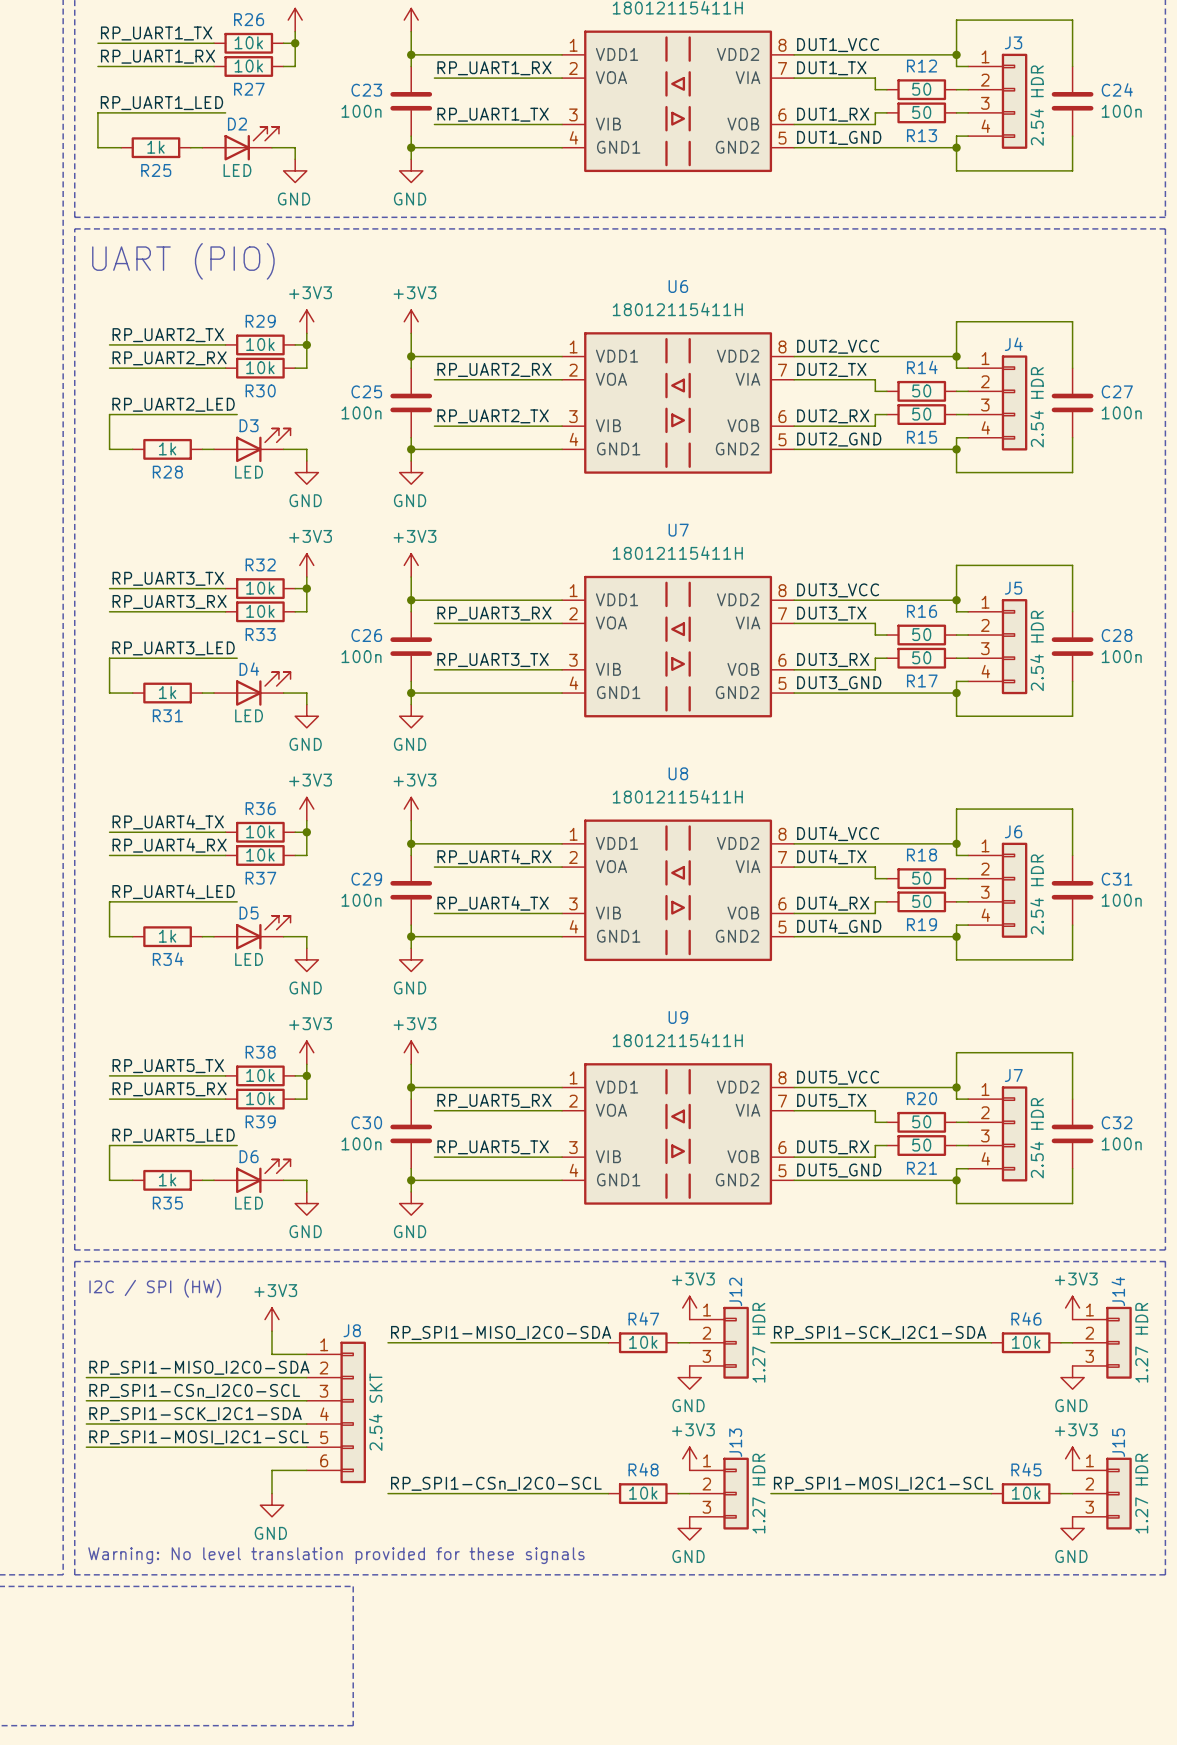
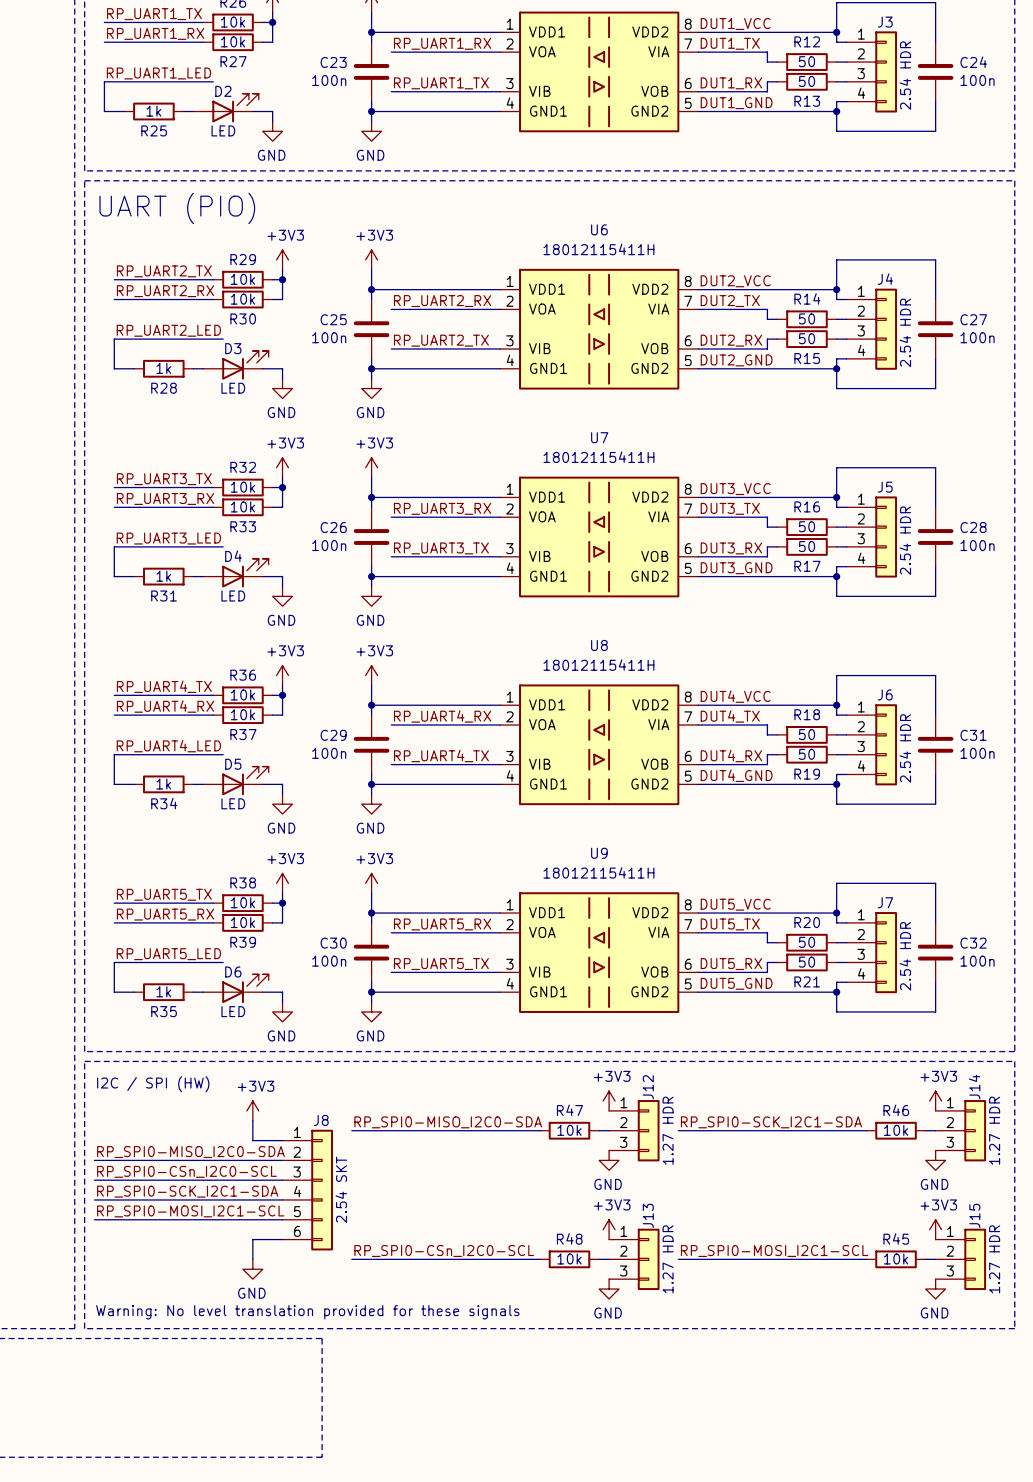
label: RP_SPI1-MISO_I2C0-SDA (501, 1332) -> RP_SPI0-MISO_I2C0-SDA (448, 1122)
label: RP_SPI1-SCK_I2C1-SDA (880, 1332) -> RP_SPI0-SCK_I2C1-SDA (771, 1122)
label: RP_SPI1-MISO_I2C0-SDA (199, 1367) -> RP_SPI0-MISO_I2C0-SDA (190, 1152)
label: RP_SPI1-CSn_I2C0-SCL (194, 1390) -> RP_SPI0-CSn_I2C0-SCL (186, 1171)
label: RP_SPI1-SCK_I2C1-SDA (195, 1414) -> RP_SPI0-SCK_I2C1-SDA (187, 1191)
label: RP_SPI1-MOSI_I2C1-SCL (199, 1437) -> RP_SPI0-MOSI_I2C1-SCL (190, 1211)
label: RP_SPI1-CSn_I2C0-SCL (496, 1483) -> RP_SPI0-CSn_I2C0-SCL (444, 1250)
label: RP_SPI1-MOSI_I2C1-SCL (883, 1483) -> RP_SPI0-MOSI_I2C1-SCL (774, 1250)

